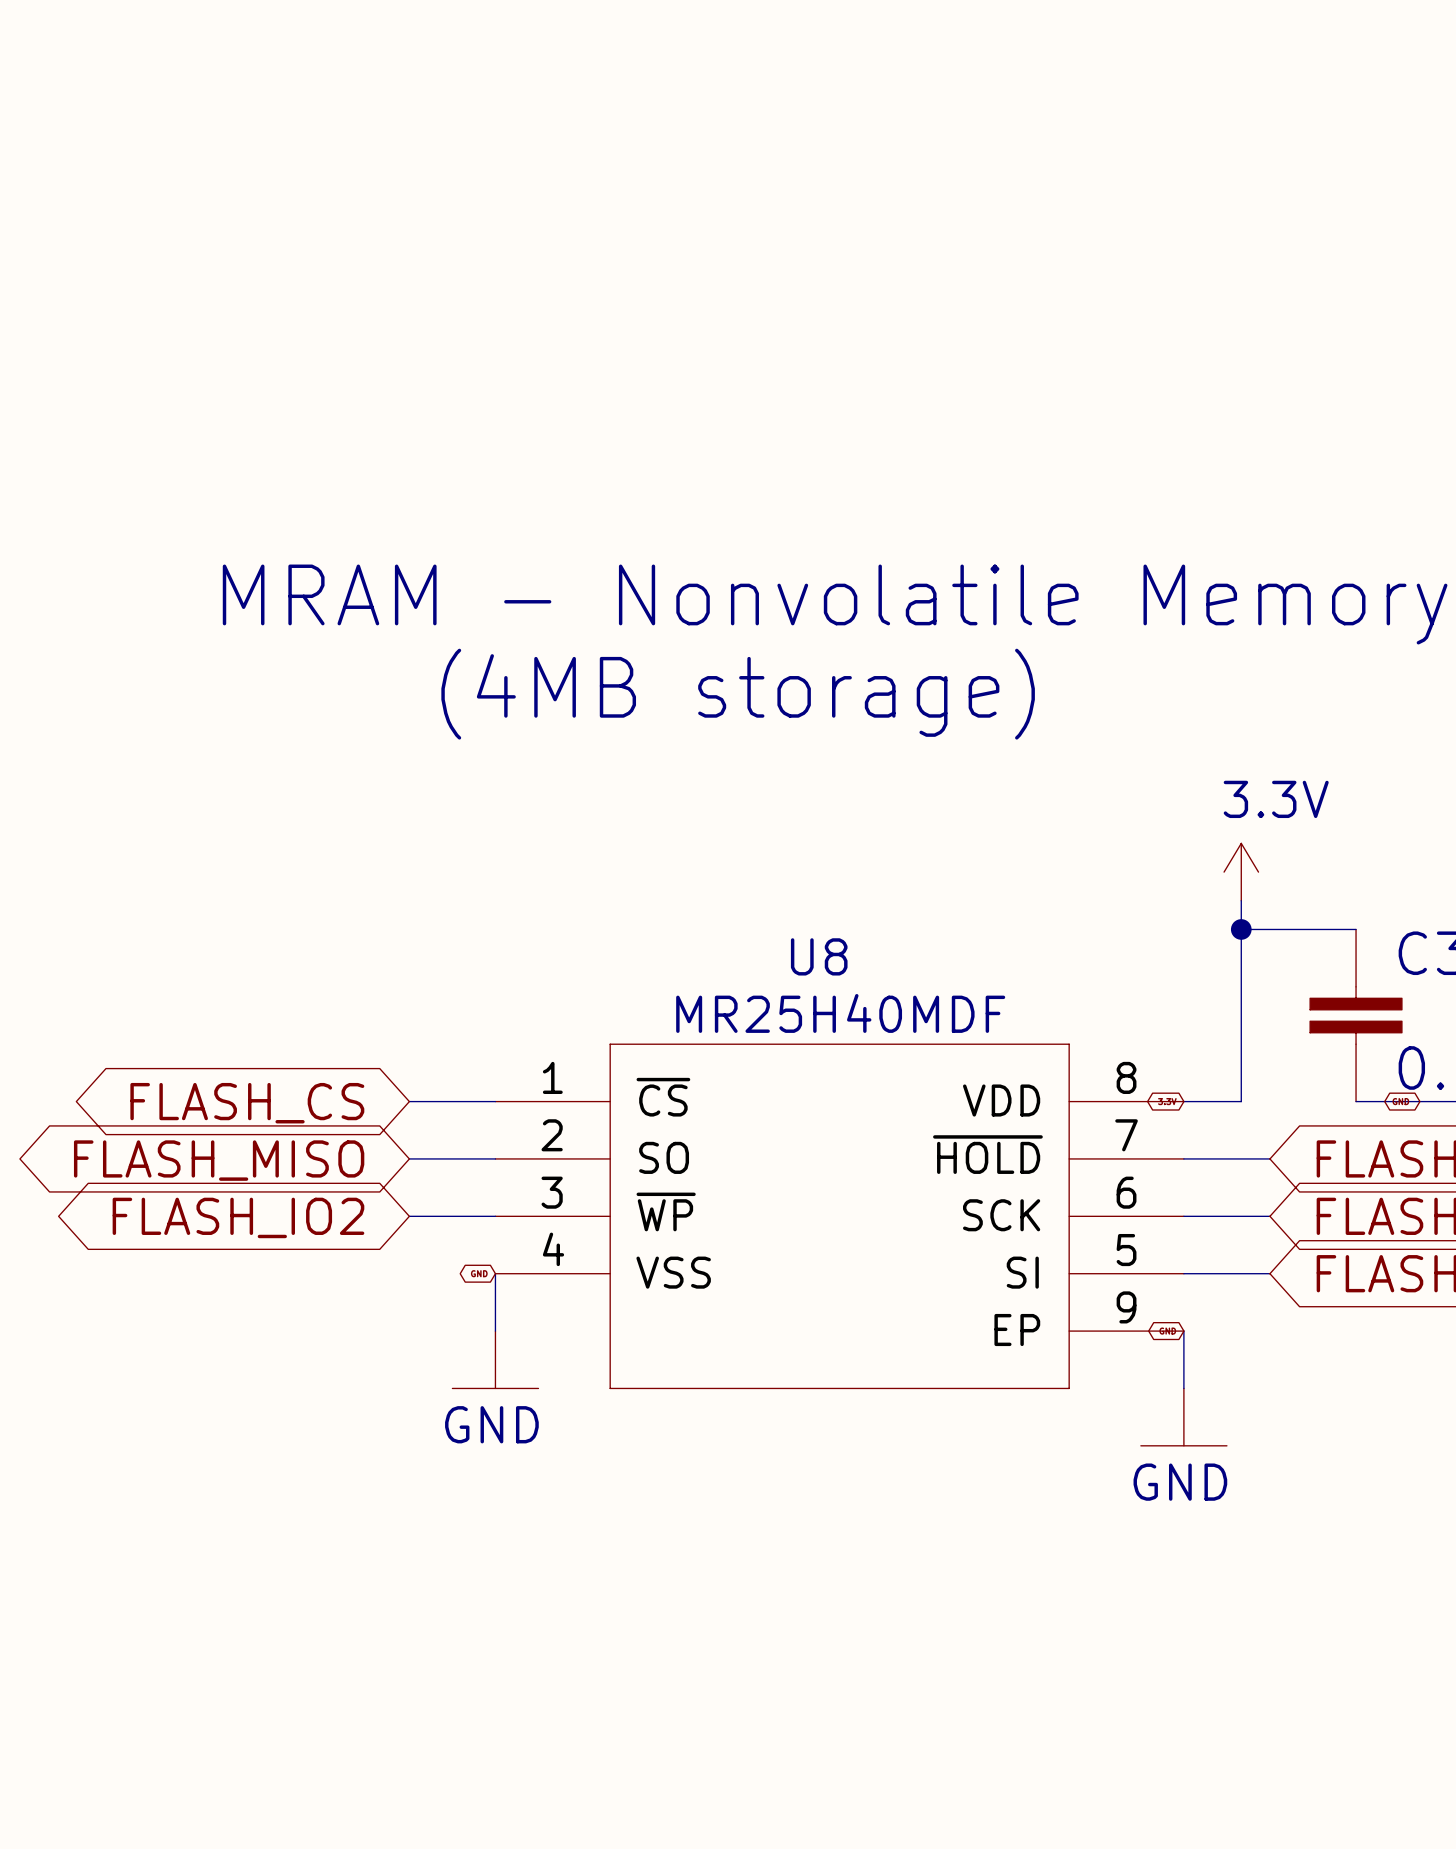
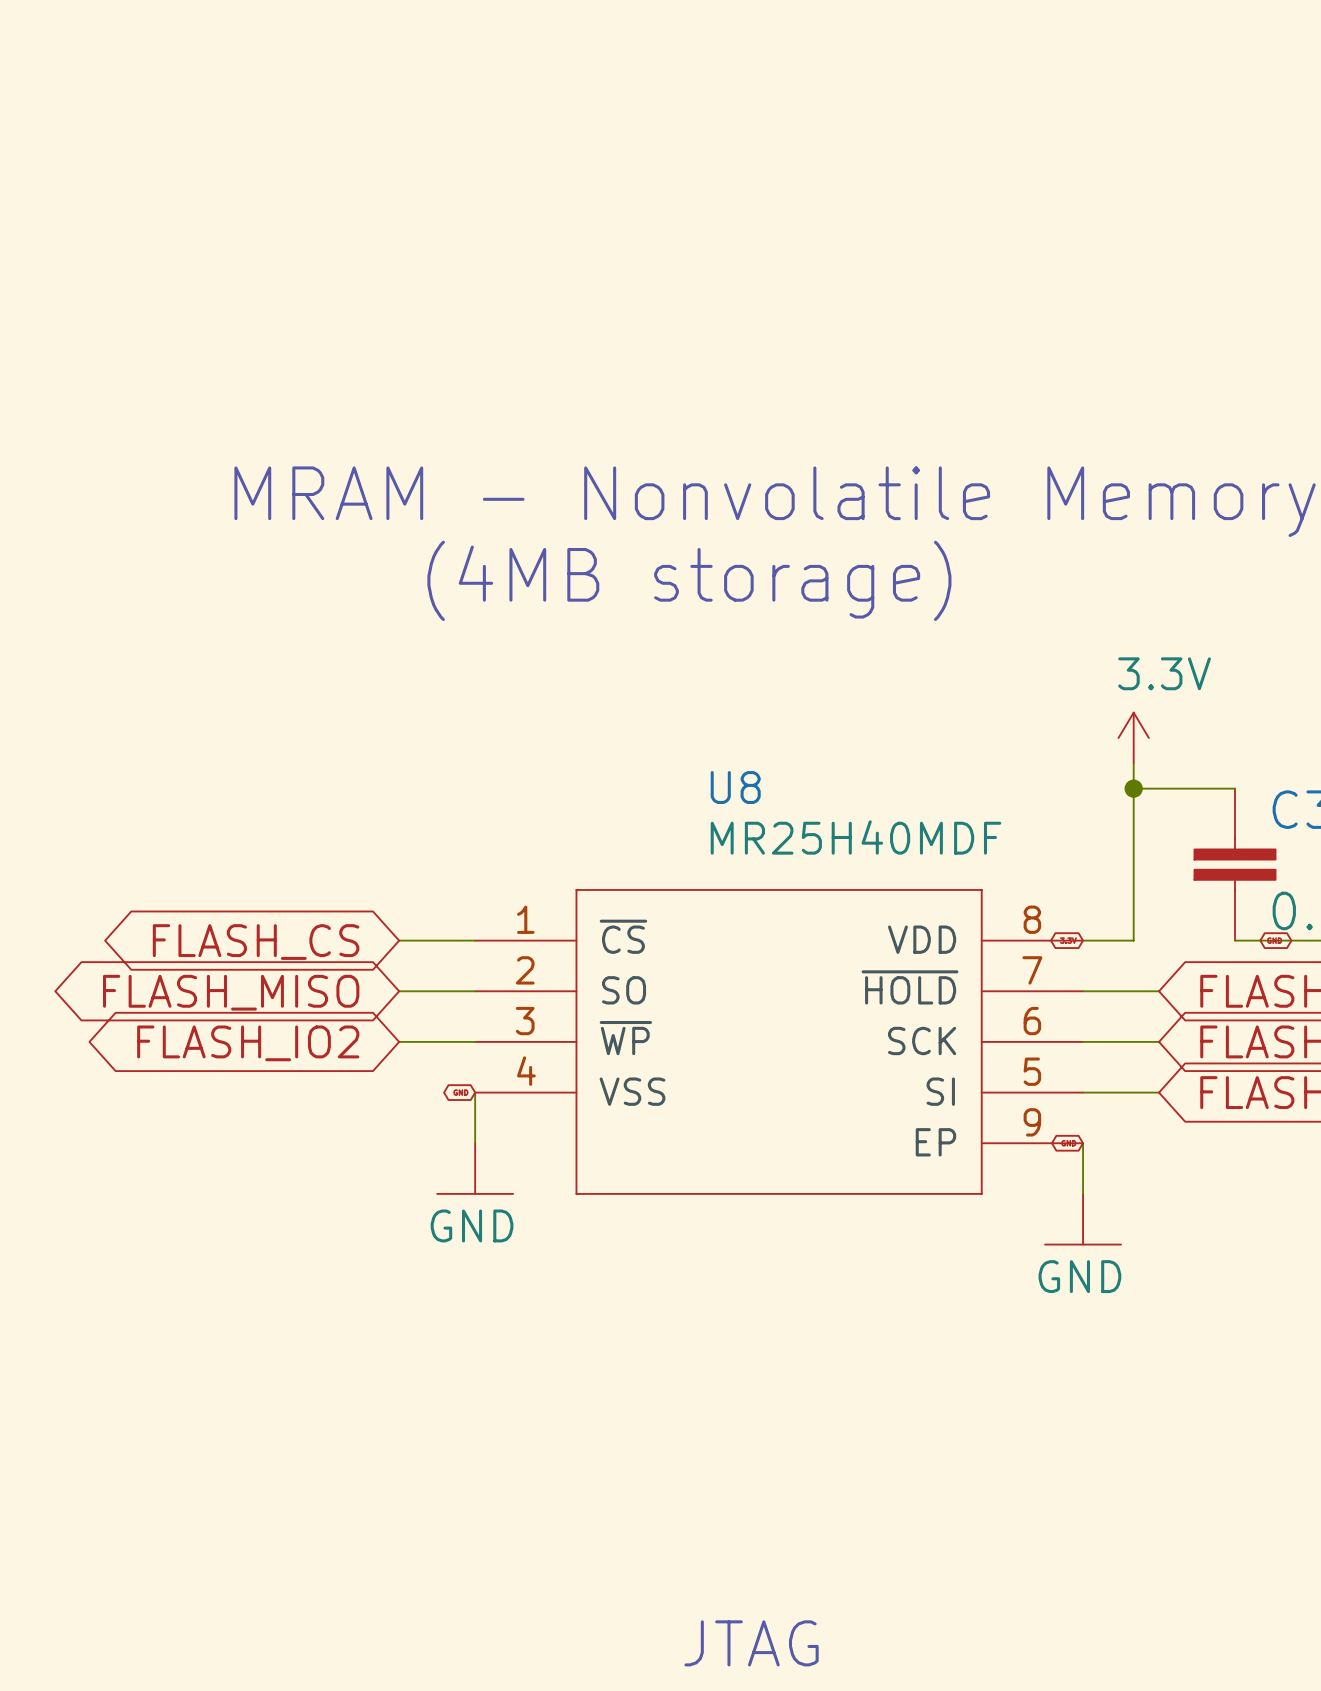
U8 name position: U8 (819, 956) -> U8 (735, 787)
U8 value position: MR25H40MDF (840, 1013) -> MR25H40MDF (855, 837)

